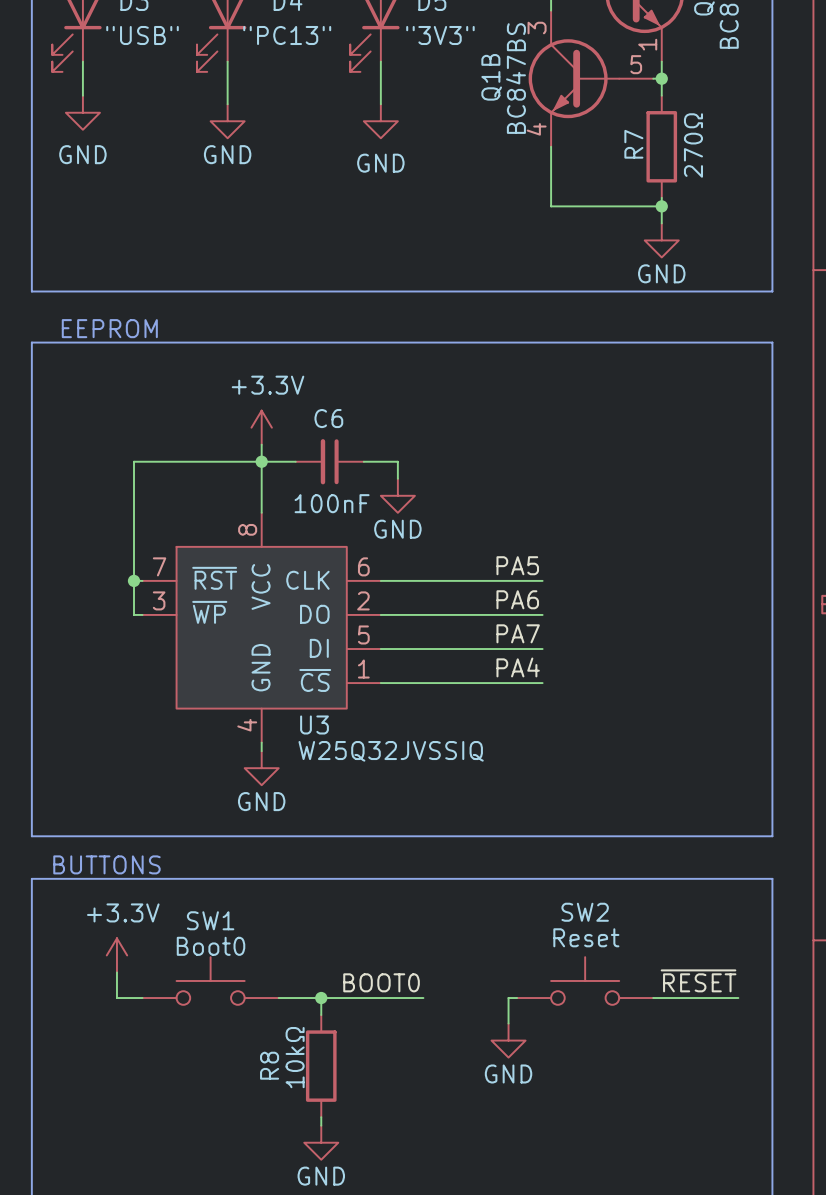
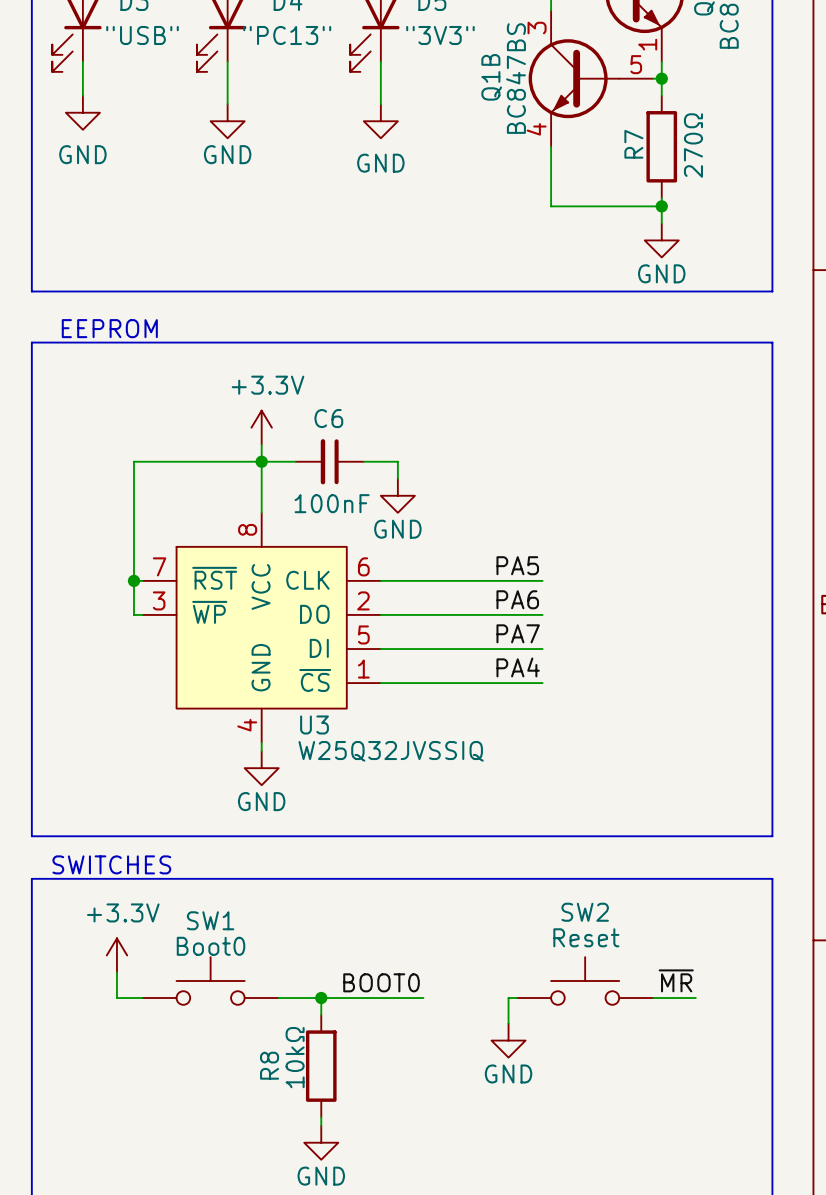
text: BUTTONS (106, 864) -> SWITCHES (111, 864)
label: ~{RESET} (698, 980) -> ~{MR} (676, 980)
wire: (695, 998) (738, 998) -> none

